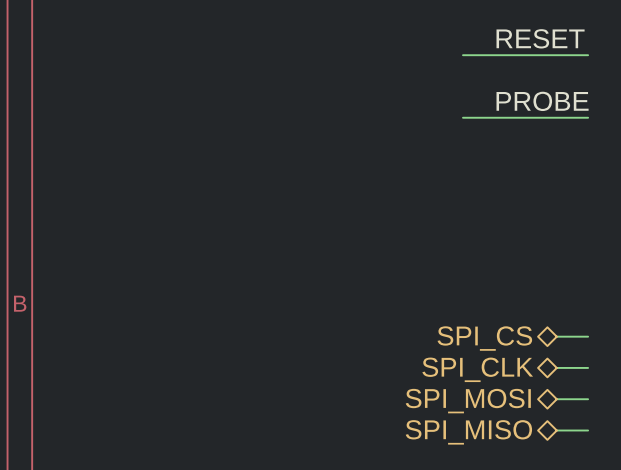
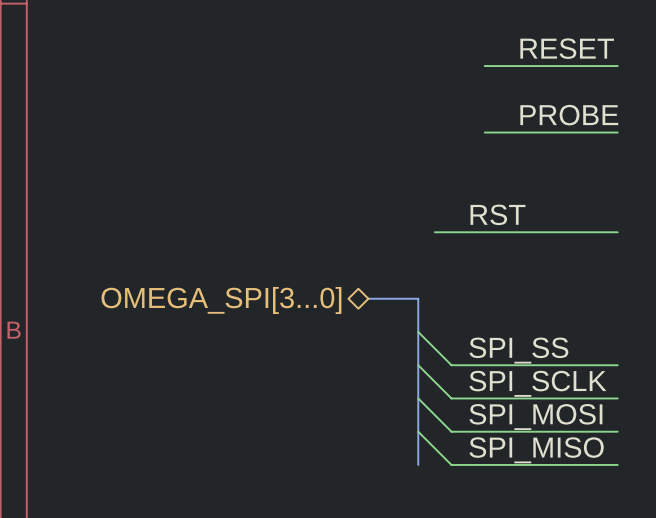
label: none -> RST (497, 214)
wire: none -> (434, 232) (617, 232)
bus: none -> (368, 298) (418, 298) (418, 464)
hierarchical label: none -> OMEGA_SPI[3...0] (221, 300)
wire: none -> (418, 331) (451, 365) (584, 365)
label: none -> SPI_SS (518, 350)
wire: none -> (418, 365) (451, 398) (584, 398)
hierarchical label: SPI_CS (484, 338) -> none
label: none -> SPI_SCLK (537, 383)
wire: none -> (418, 398) (451, 431) (584, 431)
hierarchical label: SPI_CLK (477, 369) -> none
label: none -> SPI_MOSI (535, 417)
wire: none -> (418, 431) (451, 464) (584, 464)
hierarchical label: SPI_MOSI (468, 401) -> none
label: none -> SPI_MISO (536, 450)
hierarchical label: SPI_MISO (468, 432) -> none

